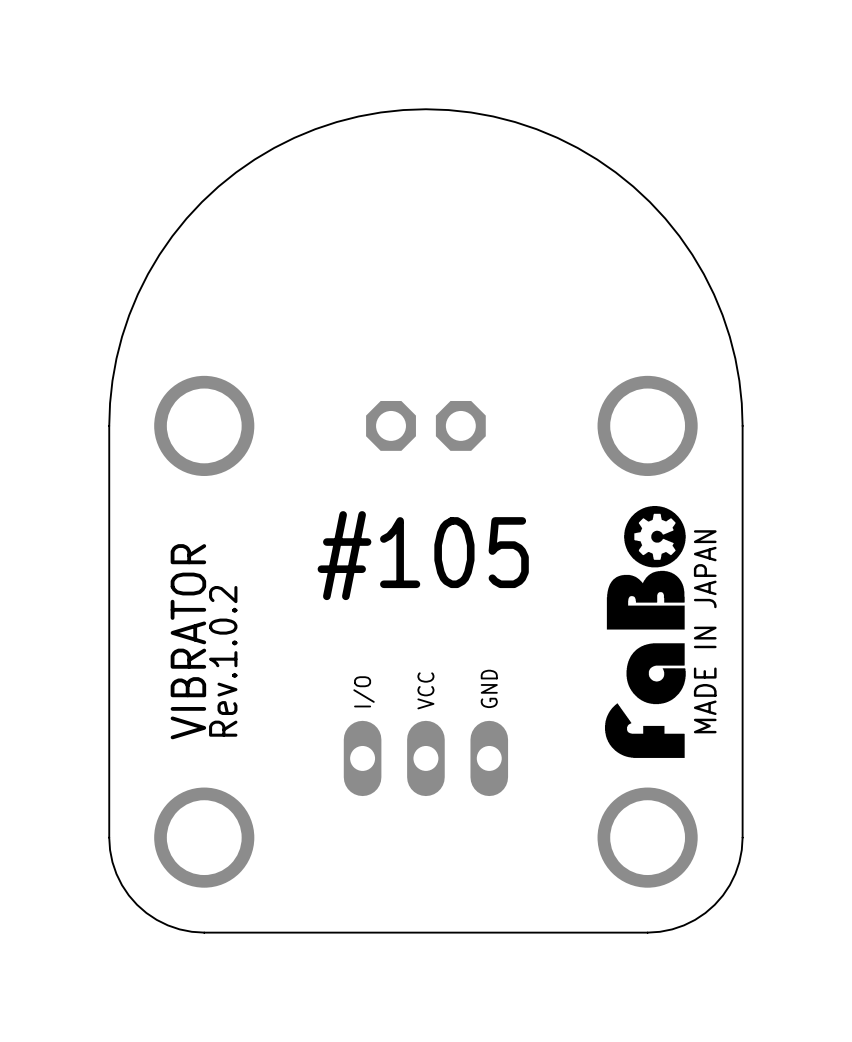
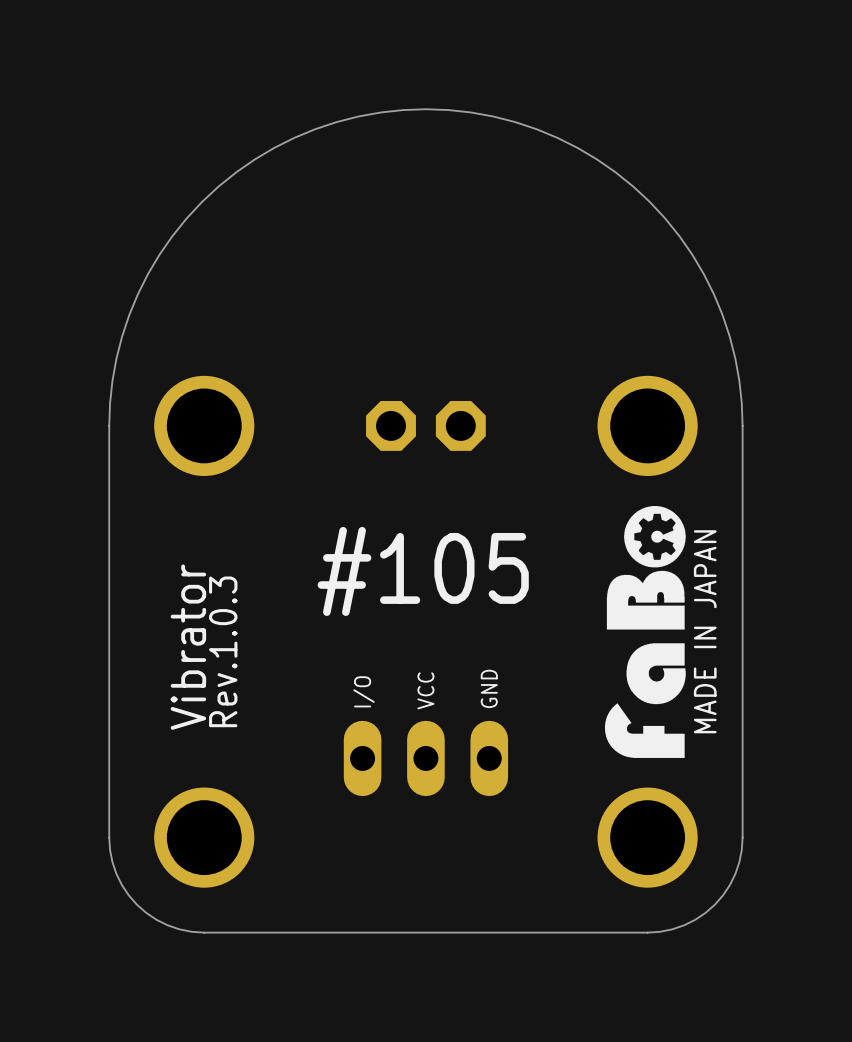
text position: #105 (423, 555) -> #105 (423, 571)
text: VIBRATOR (188, 641) -> Vibrator (188, 647)
text: Rev.1.0.2 (223, 661) -> Rev.1.0.3 (223, 651)

